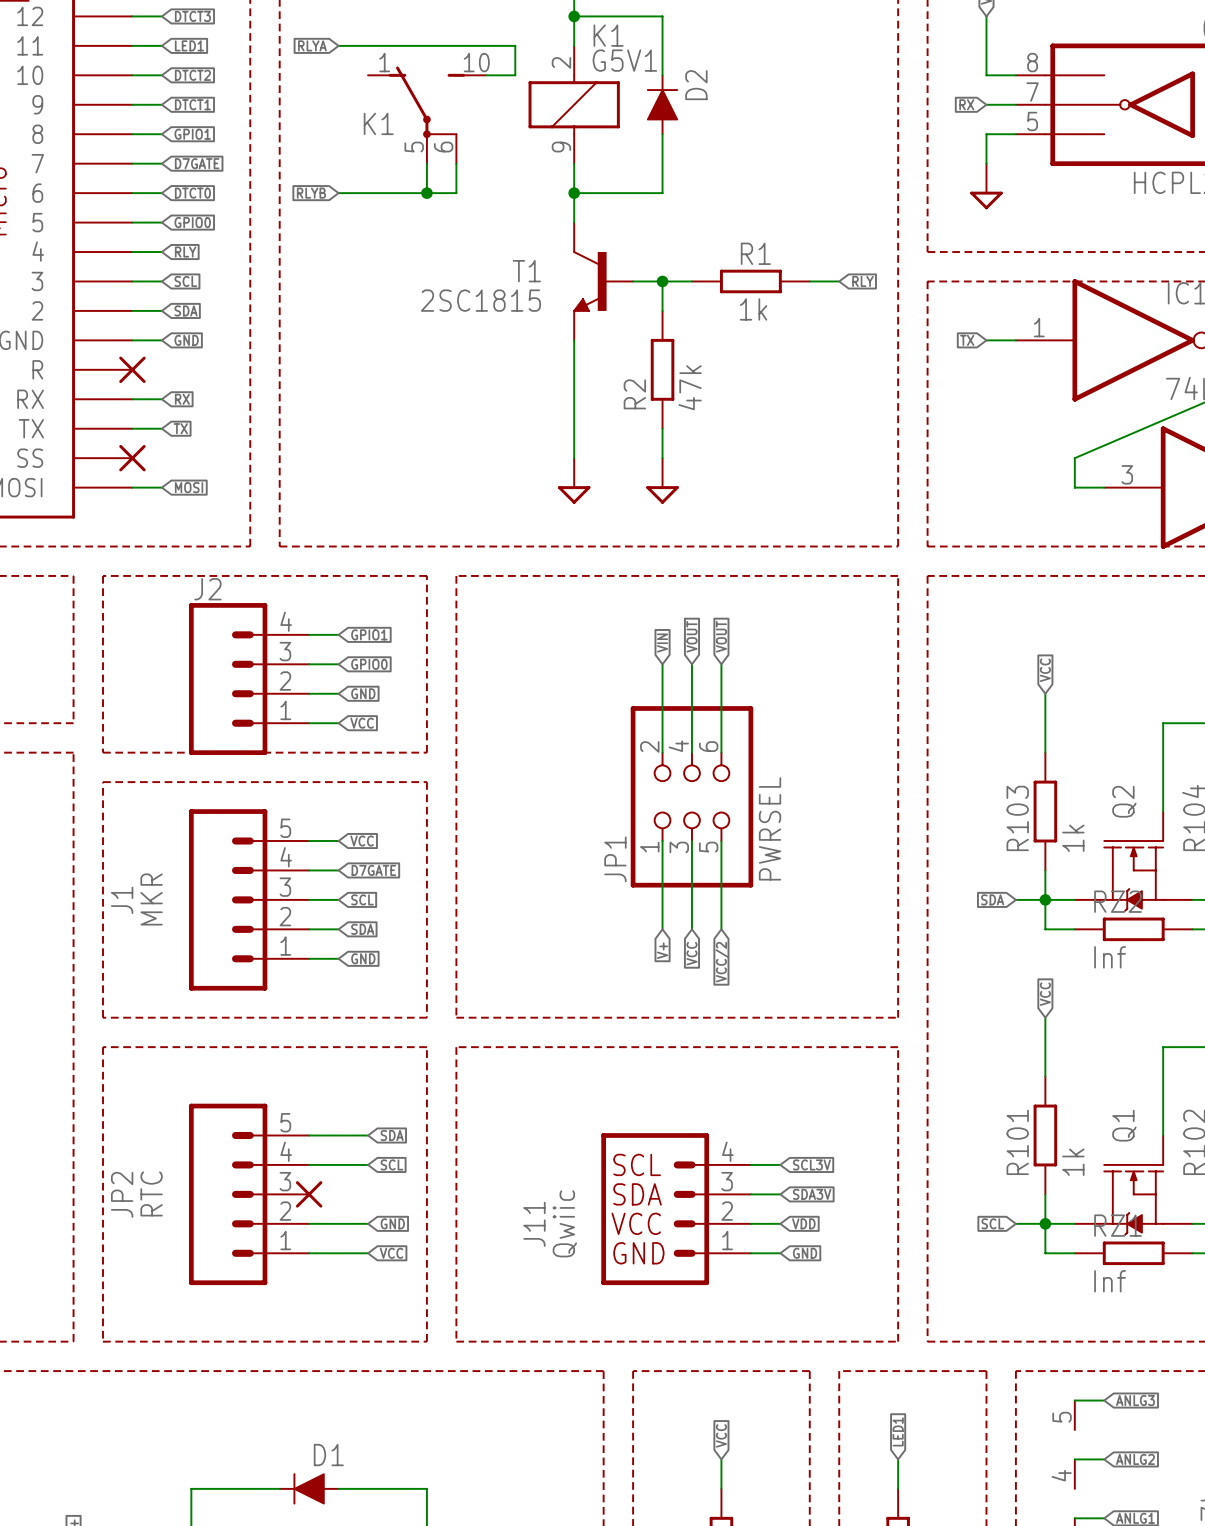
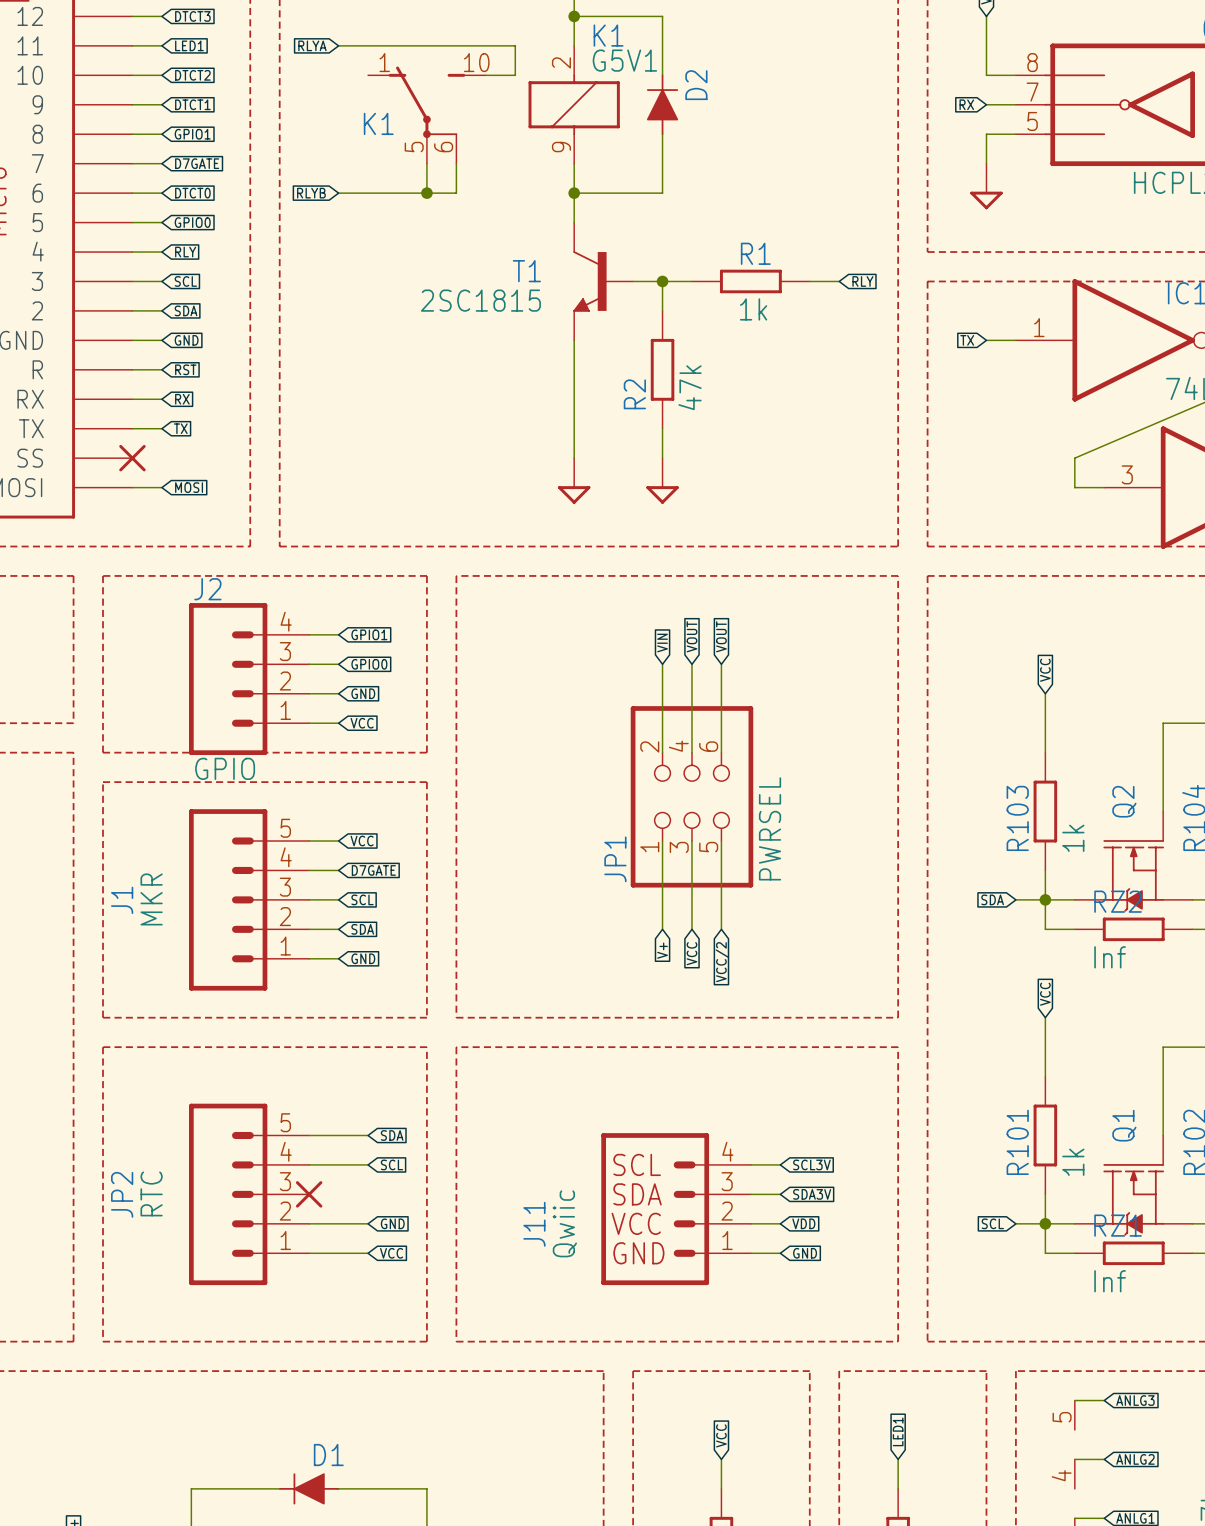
wire: none -> (132, 369) (161, 369)
part: (132, 369) -> none
global label: none -> RST (185, 369)
J2 value: none -> GPIO (225, 768)

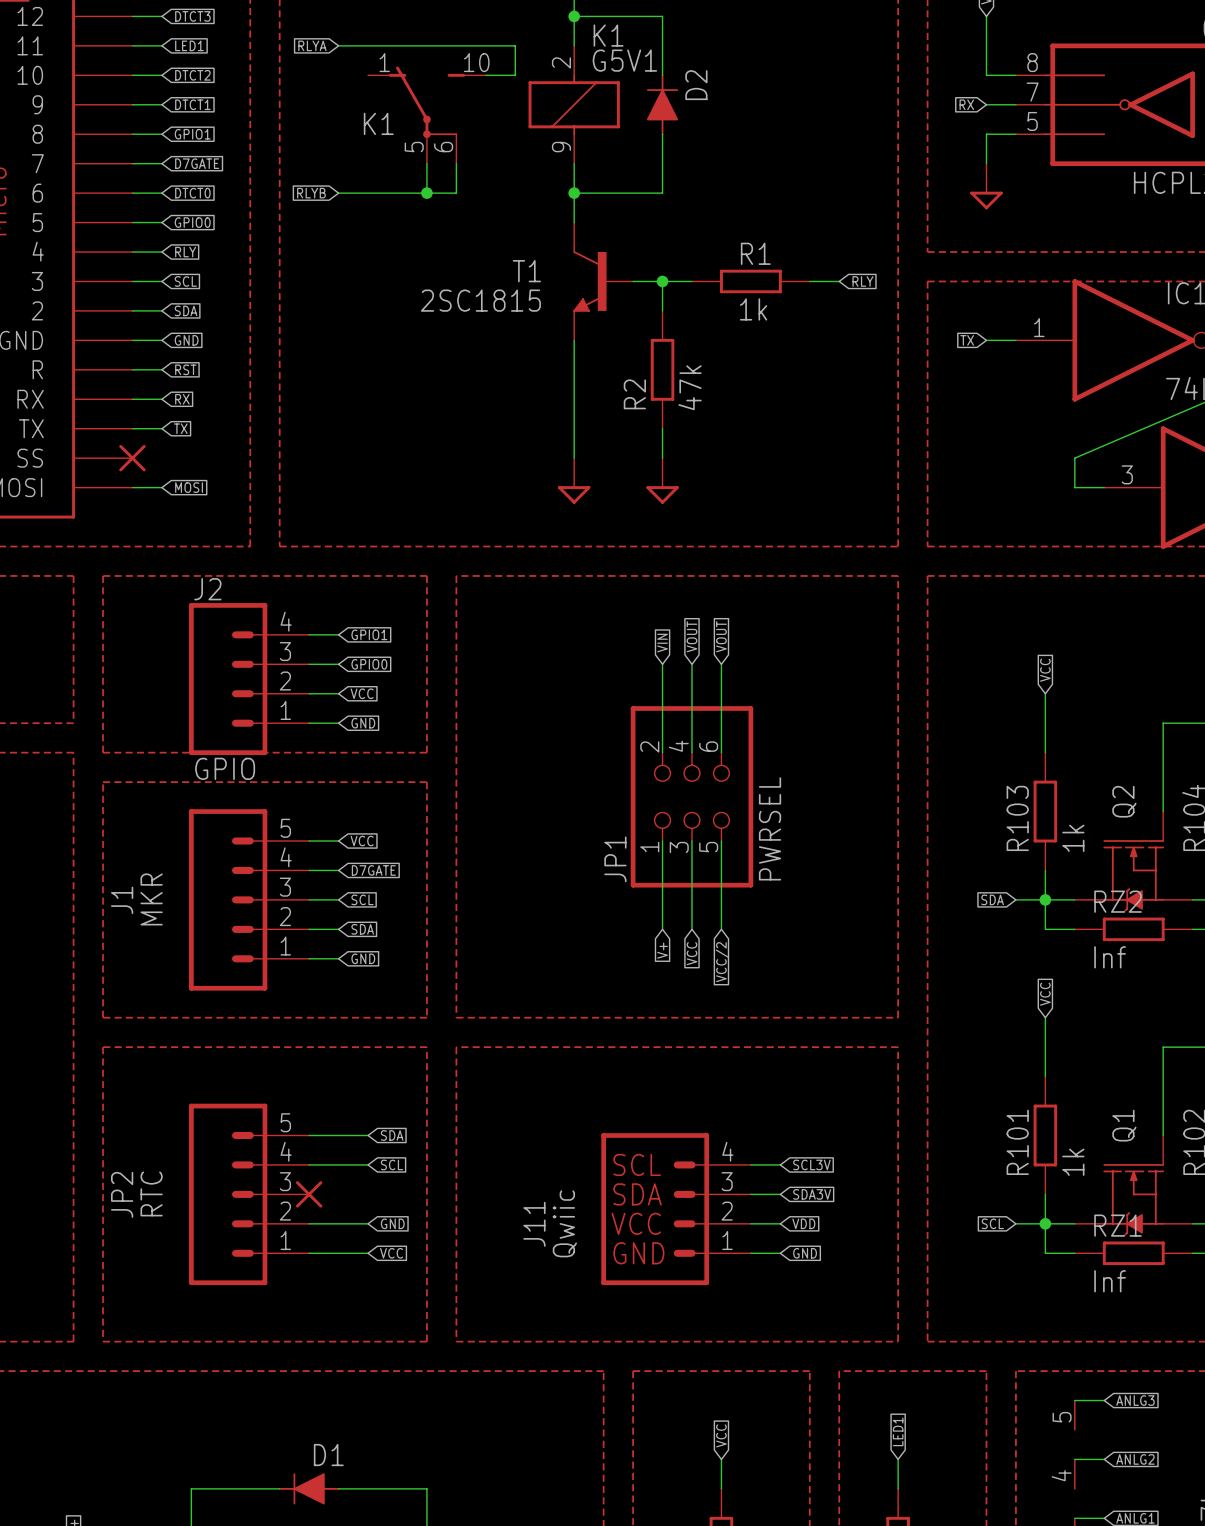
global label: GND (363, 693) -> VCC (362, 693)
global label: VCC (362, 723) -> GND (363, 723)

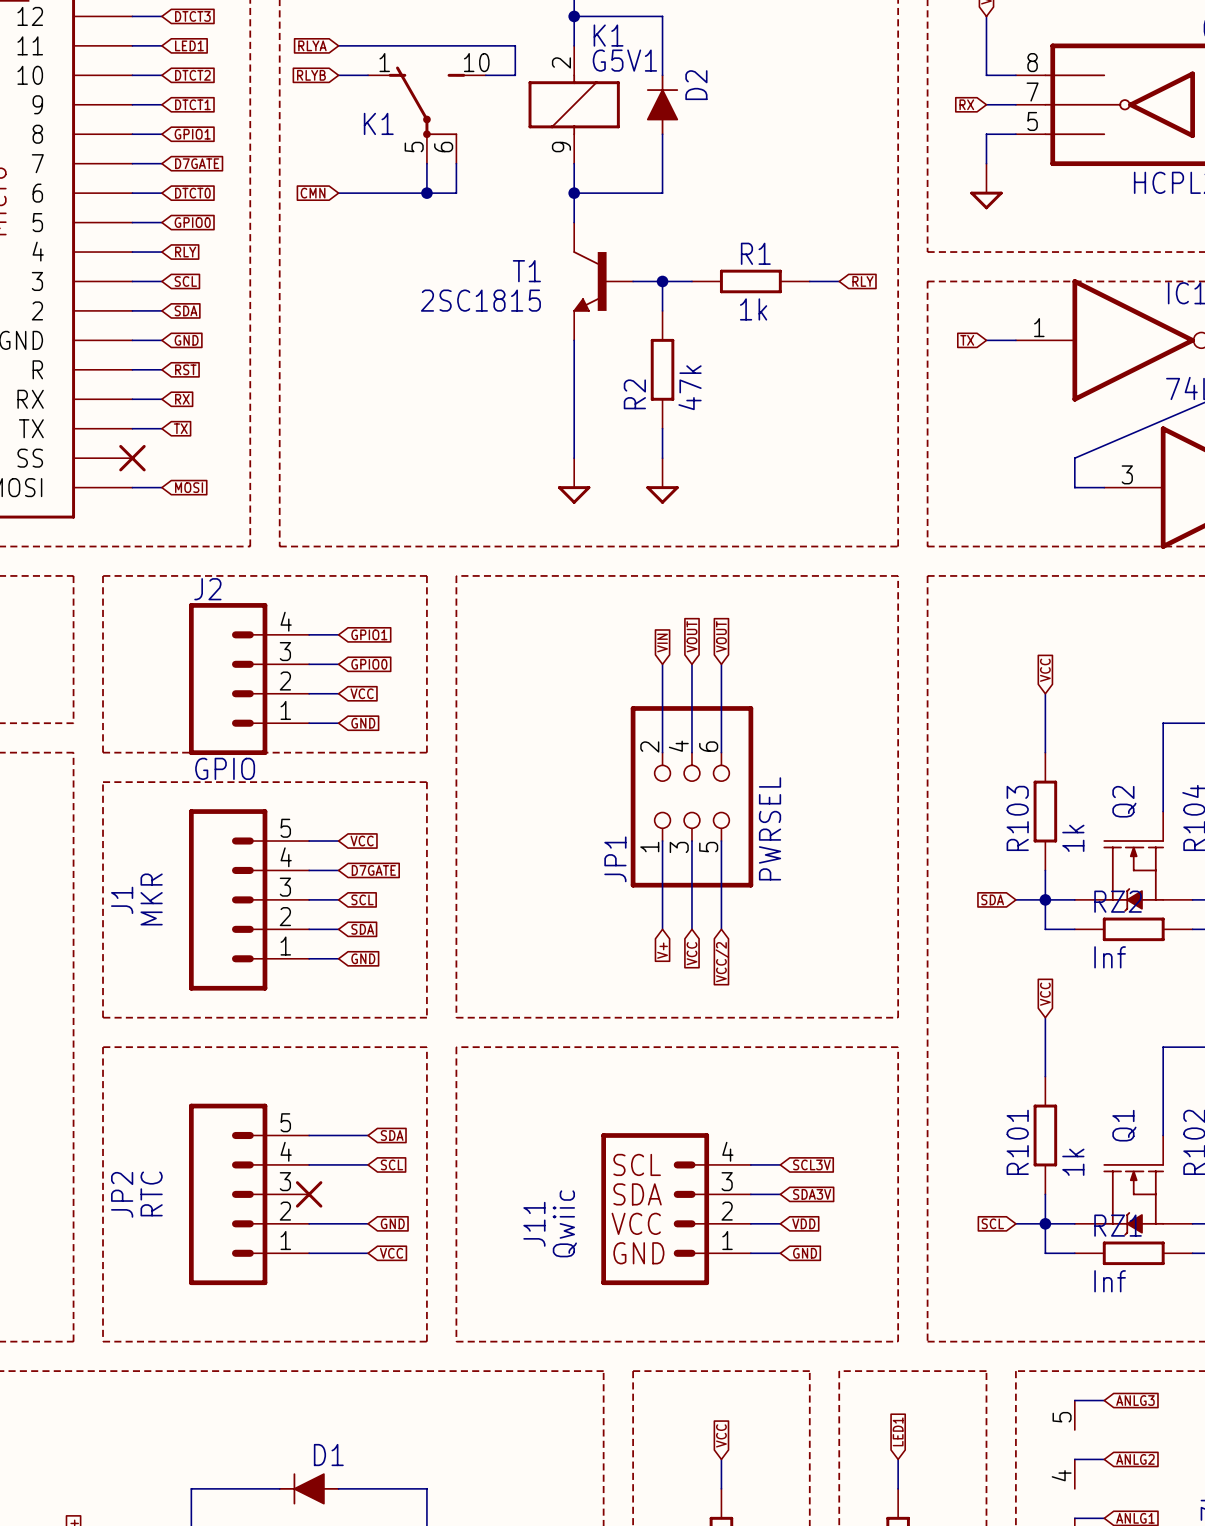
global label: none -> RLYB (311, 75)
wire: none -> (338, 75) (368, 75)
global label: RLYB (311, 193) -> CMN (313, 193)

